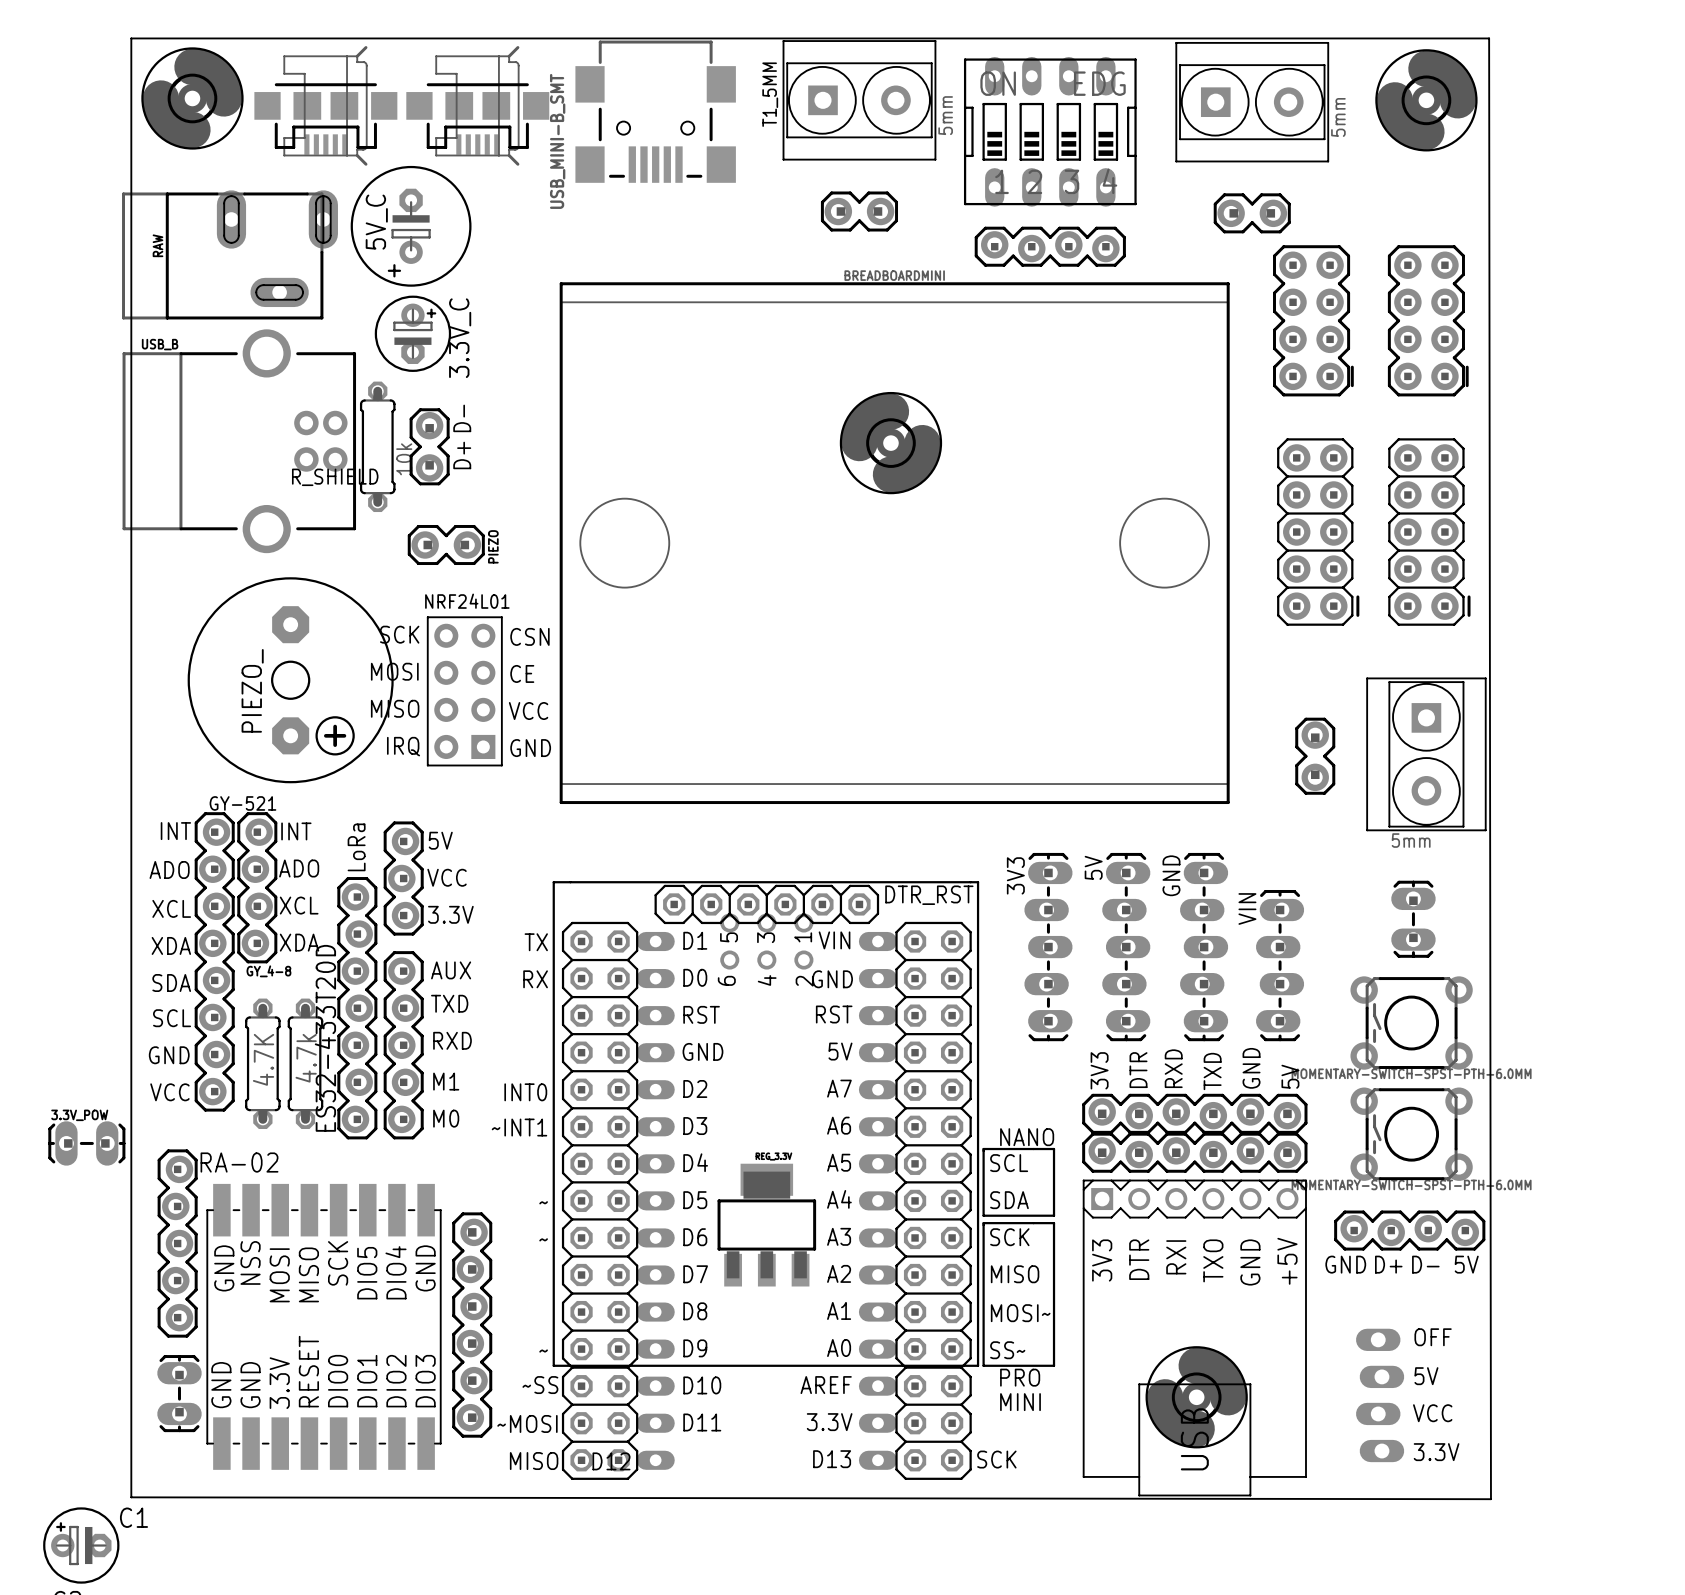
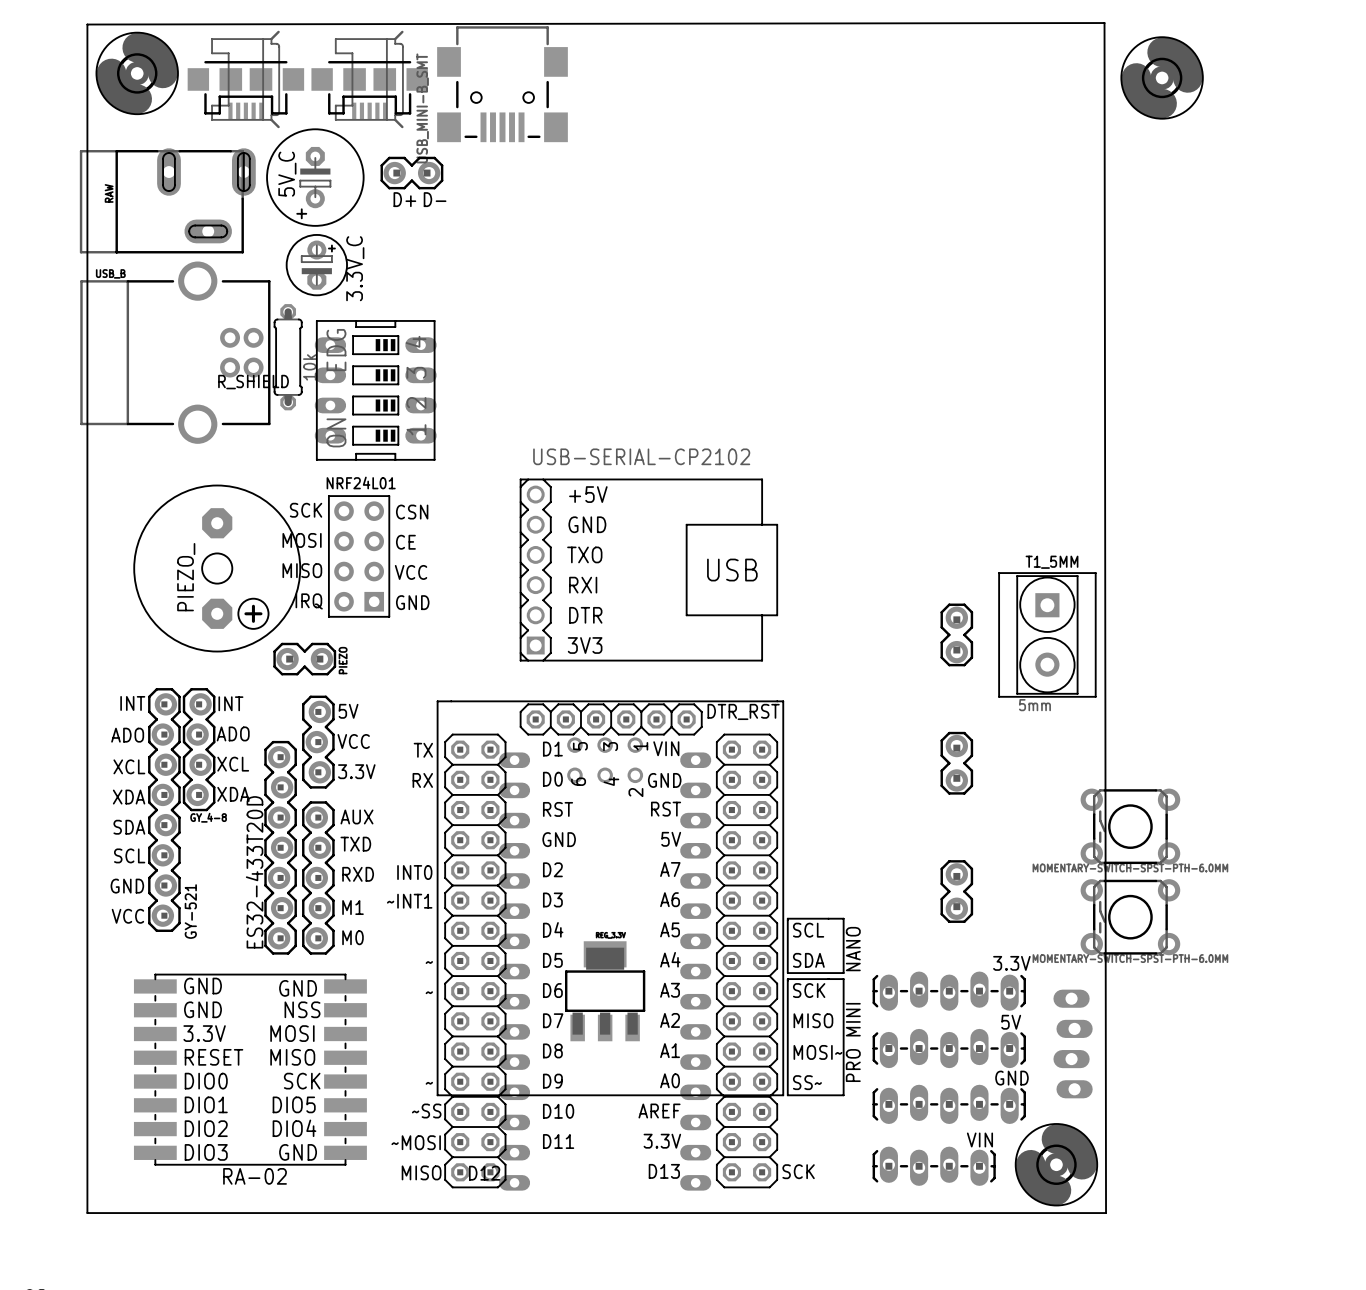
board edge: (131, 38) (1489, 38) (1490, 1499) (131, 1497) -> (87, 24) (1104, 23) (1106, 1213) (87, 1213)
T1_5MM rotation: 0° (859, 100) -> 90° clockwise (1047, 634)
T1_5MM position: (859, 100) -> (1047, 634)
part position: (1426, 100) -> (1162, 77)
part: 5mm (1252, 102) -> none
part position: (655, 111) -> (502, 84)
part: (1050, 131) -> none
part: (859, 211) -> none
part: (1252, 213) -> none
part: none -> (411, 173)
part: (1050, 246) -> none
drawing: [559, 282, 1230, 805] -> none
part: (1313, 320) -> none
part: (1428, 320) -> none
text rotation: 0° (462, 418) -> 90° clockwise (435, 199)
text position: D- (462, 418) -> D- (435, 199)
part: (890, 443) -> none
part: (429, 446) -> none
text rotation: 0° (462, 455) -> 90° clockwise (404, 199)
text position: D+ (462, 455) -> D+ (404, 199)
part: none -> (375, 390)
part: (1318, 532) -> none
part: (1429, 532) -> none
PIEZO position: (446, 545) -> (304, 659)
PIEZO_ position: (290, 680) -> (217, 568)
part: none -> USB-SERIAL-CP2102 (648, 570)
part: 5mm (1426, 754) -> none
part position: (1315, 756) -> (956, 634)
GY-521 name rotation: 0° (242, 803) -> 90° counterclockwise (190, 911)
GY-521 name position: GY-521 (242, 803) -> GY-521 (190, 911)
text: INT (175, 831) -> none
text: INT (296, 831) -> none
text position: 5V (440, 840) -> 5V (348, 711)
text: LoRa (356, 847) -> none
part footprint: [1180, 852, 1229, 1042] -> [940, 731, 974, 795]
text: 5V (1093, 867) -> none
text: ADO (299, 868) -> INT (230, 703)
text: ADO (169, 869) -> INT (132, 703)
text: 3V3 (1015, 875) -> none
text: GND (1171, 875) -> none
text position: VCC (447, 877) -> VCC (353, 741)
part position: (403, 878) -> (318, 742)
line: (553, 882) (978, 882) (978, 1365) (553, 1365) (553, 882) -> (437, 701) (783, 701) (783, 1095) (437, 1095) (437, 701)
GY_4-8 position: (257, 887) -> (199, 749)
text position: DTR_RST (929, 895) -> DTR_RST (743, 711)
part position: (766, 904) -> (611, 719)
text: XCL (299, 905) -> ADO (233, 733)
text: XCL (171, 908) -> ADO (127, 735)
text: VIN (1247, 909) -> none
text position: 3.3V (450, 914) -> 3.3V (356, 771)
part: (1413, 919) -> none
text position: 5 (729, 937) -> 5 (580, 746)
text position: 3 (766, 937) -> 3 (610, 746)
text position: 1 (803, 937) -> 1 (640, 746)
text position: D1 (695, 940) -> D1 (552, 749)
text position: VIN (834, 940) -> VIN (666, 748)
text: XDA (299, 942) -> XCL (233, 764)
text position: TX (536, 942) -> TX (423, 750)
text: XDA (171, 945) -> XCL (129, 766)
part: (1048, 947) -> none
part: (1126, 947) -> none
GY-521 position: (214, 961) -> (164, 810)
part: (1280, 965) -> none
text position: AUX (451, 970) -> AUX (356, 816)
text position: D0 (695, 977) -> D0 (552, 779)
text position: RX (535, 979) -> RX (422, 780)
text position: GND (832, 979) -> GND (664, 780)
text position: 6 (726, 980) -> 6 (578, 781)
text position: 4 (767, 980) -> 4 (611, 781)
text position: SDA (171, 983) -> SDA (129, 827)
text: none -> XDA (233, 794)
text: none -> XDA (129, 797)
text position: TXD (449, 1003) -> TXD (355, 844)
ES32-433T20D position: (357, 1008) -> (280, 847)
text position: RST (701, 1014) -> RST (558, 809)
text position: RST (834, 1014) -> RST (666, 809)
text position: SCL (172, 1018) -> SCL (129, 855)
text position: RXD (452, 1040) -> RXD (358, 874)
part position: (403, 1045) -> (318, 877)
text position: GND (702, 1051) -> GND (559, 839)
text position: 5V (840, 1051) -> 5V (671, 839)
text position: GND (169, 1055) -> GND (127, 886)
part: 4.7K (262, 1063) -> none
part: 4.7k (305, 1063) -> none
text: RXD (1173, 1068) -> none
text: GND (1251, 1068) -> none
text: 3V3 (1099, 1070) -> none
text: DTR (1138, 1070) -> none
text: TXD (1212, 1071) -> none
text: 5V (1290, 1076) -> none
text position: M1 (446, 1081) -> M1 (352, 907)
text position: D2 (695, 1088) -> D2 (552, 869)
text position: A7 (839, 1088) -> A7 (670, 869)
text position: VCC (169, 1092) -> VCC (127, 916)
text position: INT0 (525, 1092) -> INT0 (414, 872)
part footprint: [1082, 1093, 1308, 1134] -> [940, 860, 974, 923]
text position: M0 (446, 1118) -> M0 (352, 937)
text position: A6 (839, 1125) -> A6 (670, 899)
text position: D3 (695, 1126) -> D3 (552, 899)
text position: ~INT1 (519, 1127) -> ~INT1 (409, 901)
text rotation: 0° (1027, 1137) -> 90° counterclockwise (853, 949)
3.3V_POW: (86, 1143) -> none
line: (983, 1149) (983, 1215) (1054, 1215) (1054, 1149) (983, 1149) -> (787, 918) (787, 973) (843, 973) (843, 918) (787, 918)
part: (1194, 1152) -> none
RA-02 name position: RA-02 (239, 1162) -> RA-02 (255, 1176)
text position: D4 (695, 1162) -> D4 (553, 929)
text position: A5 (839, 1162) -> A5 (670, 929)
text position: SCL (1009, 1163) -> SCL (808, 930)
text: none -> ~ (429, 962)
text: none -> 3.3V (1011, 963)
text position: A4 (839, 1199) -> A4 (670, 959)
part position: (600, 1200) -> (475, 960)
text position: D5 (695, 1200) -> D5 (552, 960)
part position: (933, 1200) -> (747, 960)
text position: SDA (1009, 1200) -> SDA (808, 960)
text: ~ (543, 1202) -> none
line: (983, 1223) (983, 1365) (1054, 1365) (1054, 1223) (983, 1223) -> (787, 979) (787, 1095) (843, 1095) (843, 979) (787, 979)
part: none -> (949, 991)
text: none -> ~ (429, 992)
part: (1409, 1230) -> none
text position: A3 (839, 1236) -> A3 (670, 990)
text position: D6 (695, 1237) -> D6 (552, 990)
text position: SCK (1009, 1237) -> SCK (809, 990)
text: ~ (543, 1239) -> none
part: (177, 1243) -> none
text: none -> 5V (1011, 1022)
text: GND (1345, 1264) -> none
text: D+ (1388, 1264) -> none
text: D- (1425, 1264) -> none
text: 5V (1466, 1264) -> none
text position: A2 (839, 1273) -> A2 (670, 1020)
text position: D7 (695, 1274) -> D7 (553, 1020)
text position: MISO (1015, 1274) -> MISO (813, 1020)
text: none -> PRO MINI (853, 1042)
part: none -> (949, 1048)
text position: A1 (839, 1310) -> A1 (670, 1050)
text position: D8 (695, 1311) -> D8 (552, 1050)
text position: MOSI~ (1020, 1313) -> MOSI~ (817, 1052)
part: (472, 1325) -> none
RA-02 rotation: 0° (324, 1326) -> 90° clockwise (250, 1069)
text: none -> GND (1011, 1078)
text: OFF (1433, 1337) -> none
part: (1194, 1338) -> none
text position: D9 (695, 1348) -> D9 (552, 1081)
text position: A0 (839, 1348) -> A0 (670, 1080)
text position: SS~ (1007, 1350) -> SS~ (807, 1082)
text position: ~ (543, 1351) -> ~ (429, 1083)
part: none -> (949, 1104)
text: 5V (1426, 1376) -> none
text: PRO (1020, 1377) -> none
text position: ~SS (540, 1385) -> ~SS (426, 1111)
text position: D10 (702, 1385) -> D10 (558, 1111)
text position: AREF (826, 1385) -> AREF (659, 1111)
part: (179, 1393) -> none
part position: (1380, 1395) -> (1073, 1043)
part position: (1196, 1397) -> (1056, 1164)
text: MINI (1020, 1402) -> none
text: none -> VIN (979, 1139)
text: VCC (1432, 1413) -> none
text position: D11 (702, 1422) -> D11 (558, 1141)
text position: 3.3V (829, 1422) -> 3.3V (662, 1141)
text position: ~MOSI (527, 1423) -> ~MOSI (416, 1142)
part: none -> (934, 1166)
text: 3.3V (1436, 1452) -> none
text position: D13 (832, 1459) -> D13 (664, 1171)
text position: SCK (996, 1459) -> SCK (798, 1171)
text position: MISO (534, 1461) -> MISO (421, 1172)
text position: D12 (611, 1461) -> D12 (484, 1173)
C1: (81, 1545) -> none

